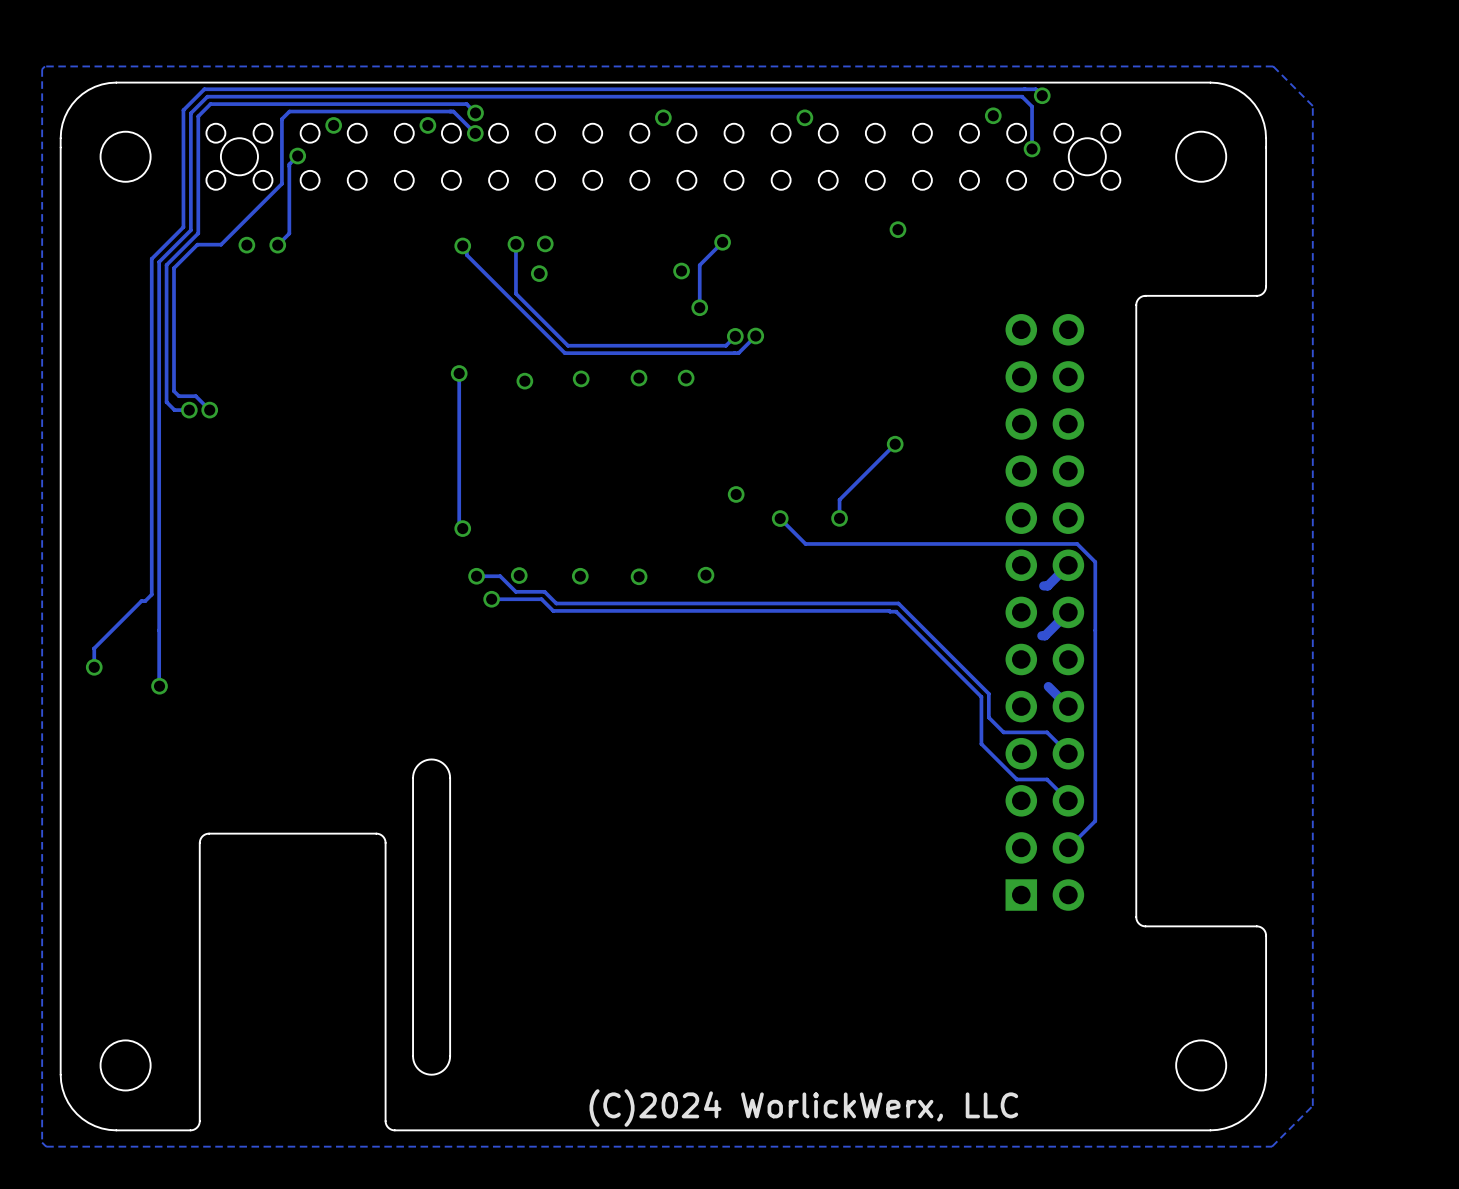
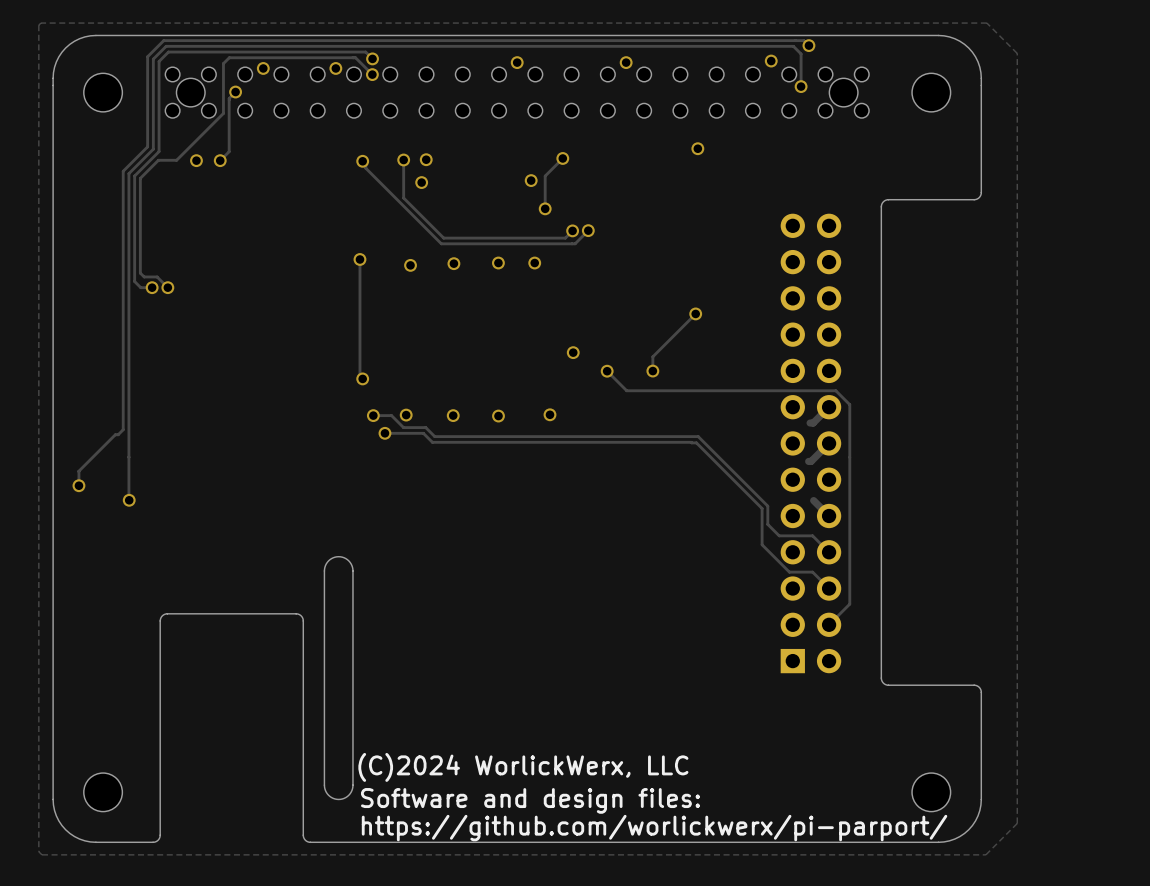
text: none -> Software and design files: (530, 800)
text position: (C)2024 WorlickWerx, LLC (803, 1108) -> (C)2024 WorlickWerx, LLC (523, 767)
text: none -> https://github.com/worlickwerx/pi-parport/ (654, 828)

